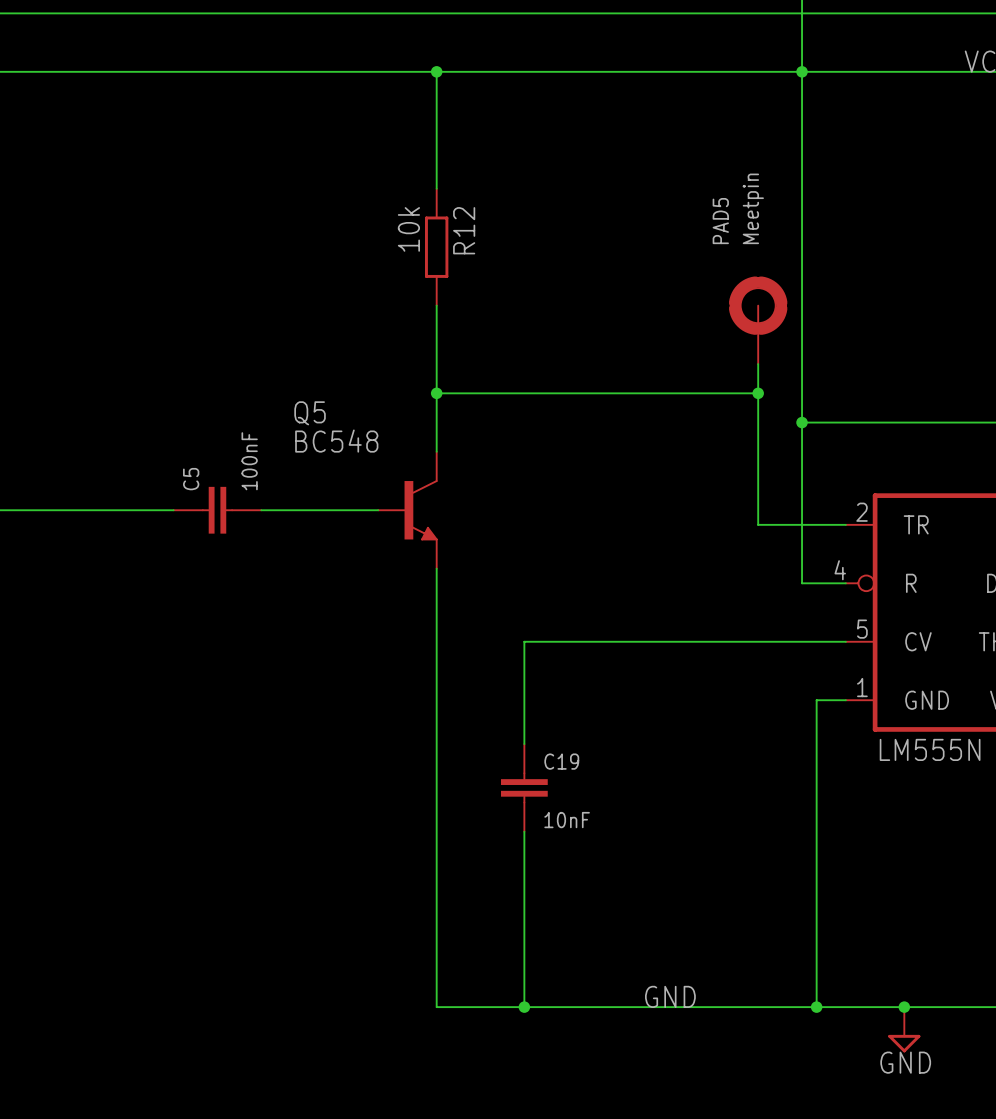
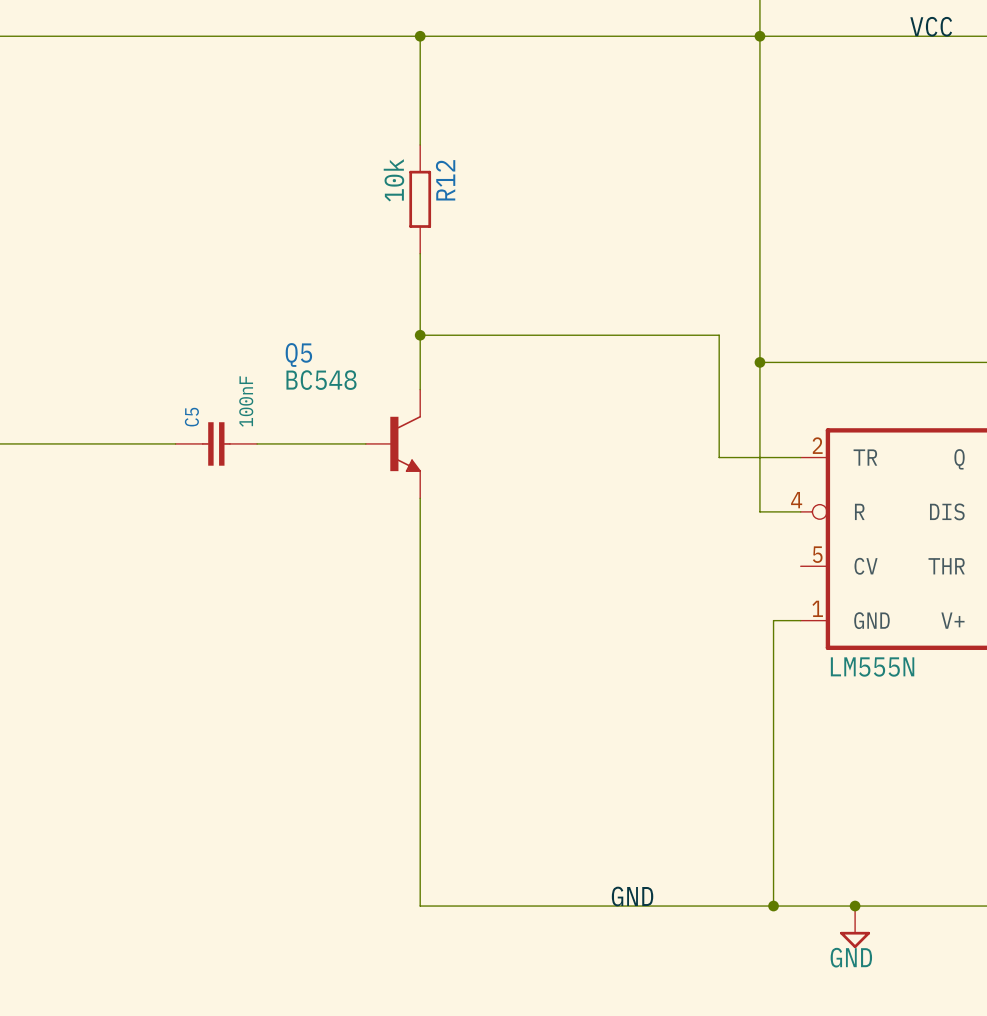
PAD5: Meetpin (758, 320) -> none
wire: (758, 364) (758, 393) -> none
junction: (758, 393) -> none
wire: (845, 641) (524, 641) (524, 744) -> none
C19: 10nF (524, 787) -> none
wire: (524, 831) (524, 1007) -> none
junction: (524, 1007) -> none

